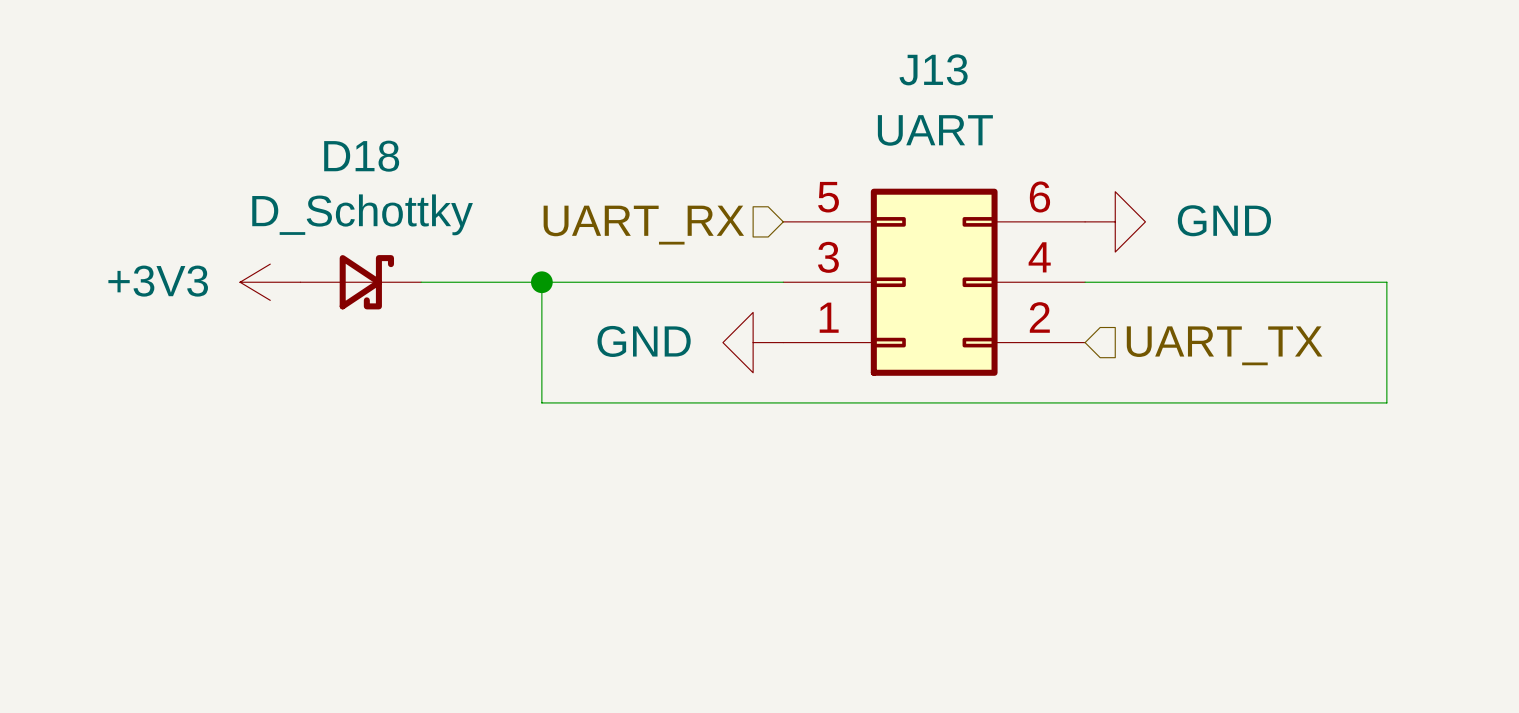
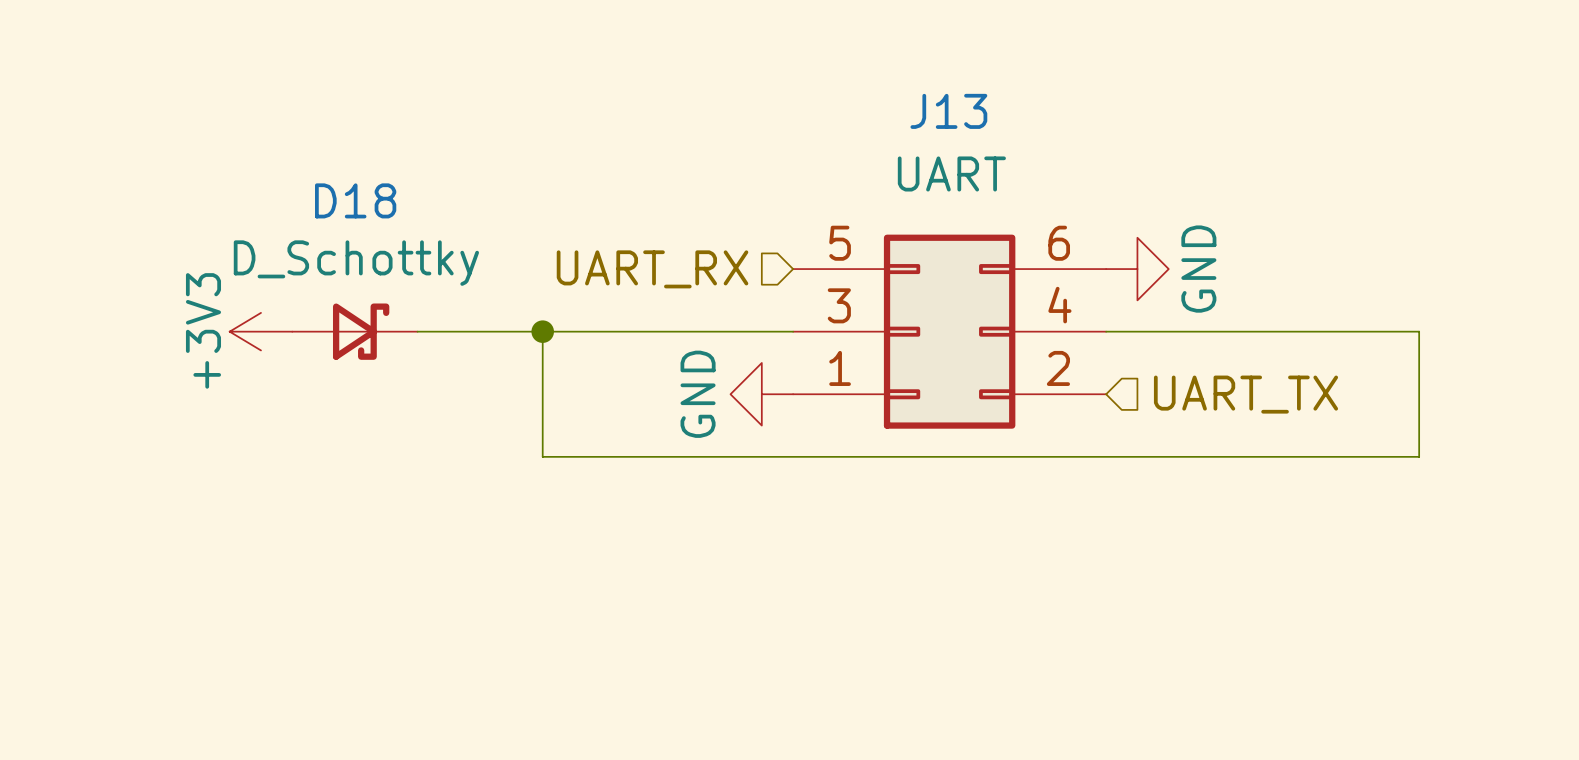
power symbol text rotation: 0° (1224, 220) -> 90° counterclockwise (1198, 269)
power symbol text rotation: 0° (158, 281) -> 90° counterclockwise (203, 330)
power symbol text rotation: 0° (644, 341) -> 90° counterclockwise (698, 394)

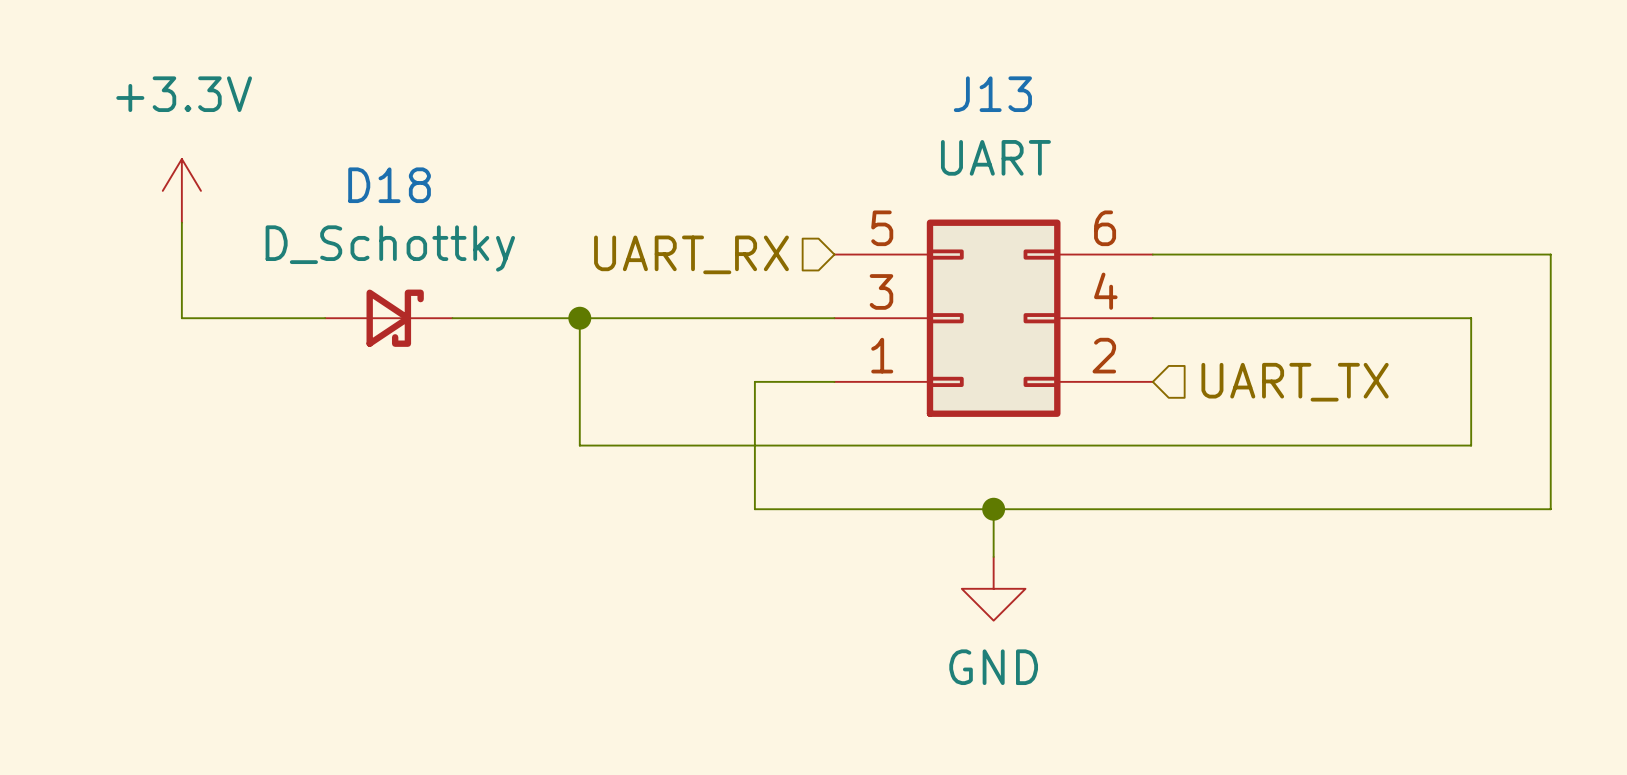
power symbol: none -> +3.3V (181, 190)
wire: none -> (181, 222) (181, 318) (325, 318)
wire: none -> (1152, 254) (1550, 254) (1550, 509) (754, 509) (754, 381) (834, 381)
power symbol: GND (1137, 269) -> none
power symbol: +3V3 (260, 331) -> none
power symbol: GND (761, 394) -> none
wire: none -> (993, 509) (993, 556)
junction: none -> (993, 509)
power symbol: none -> GND (993, 588)

